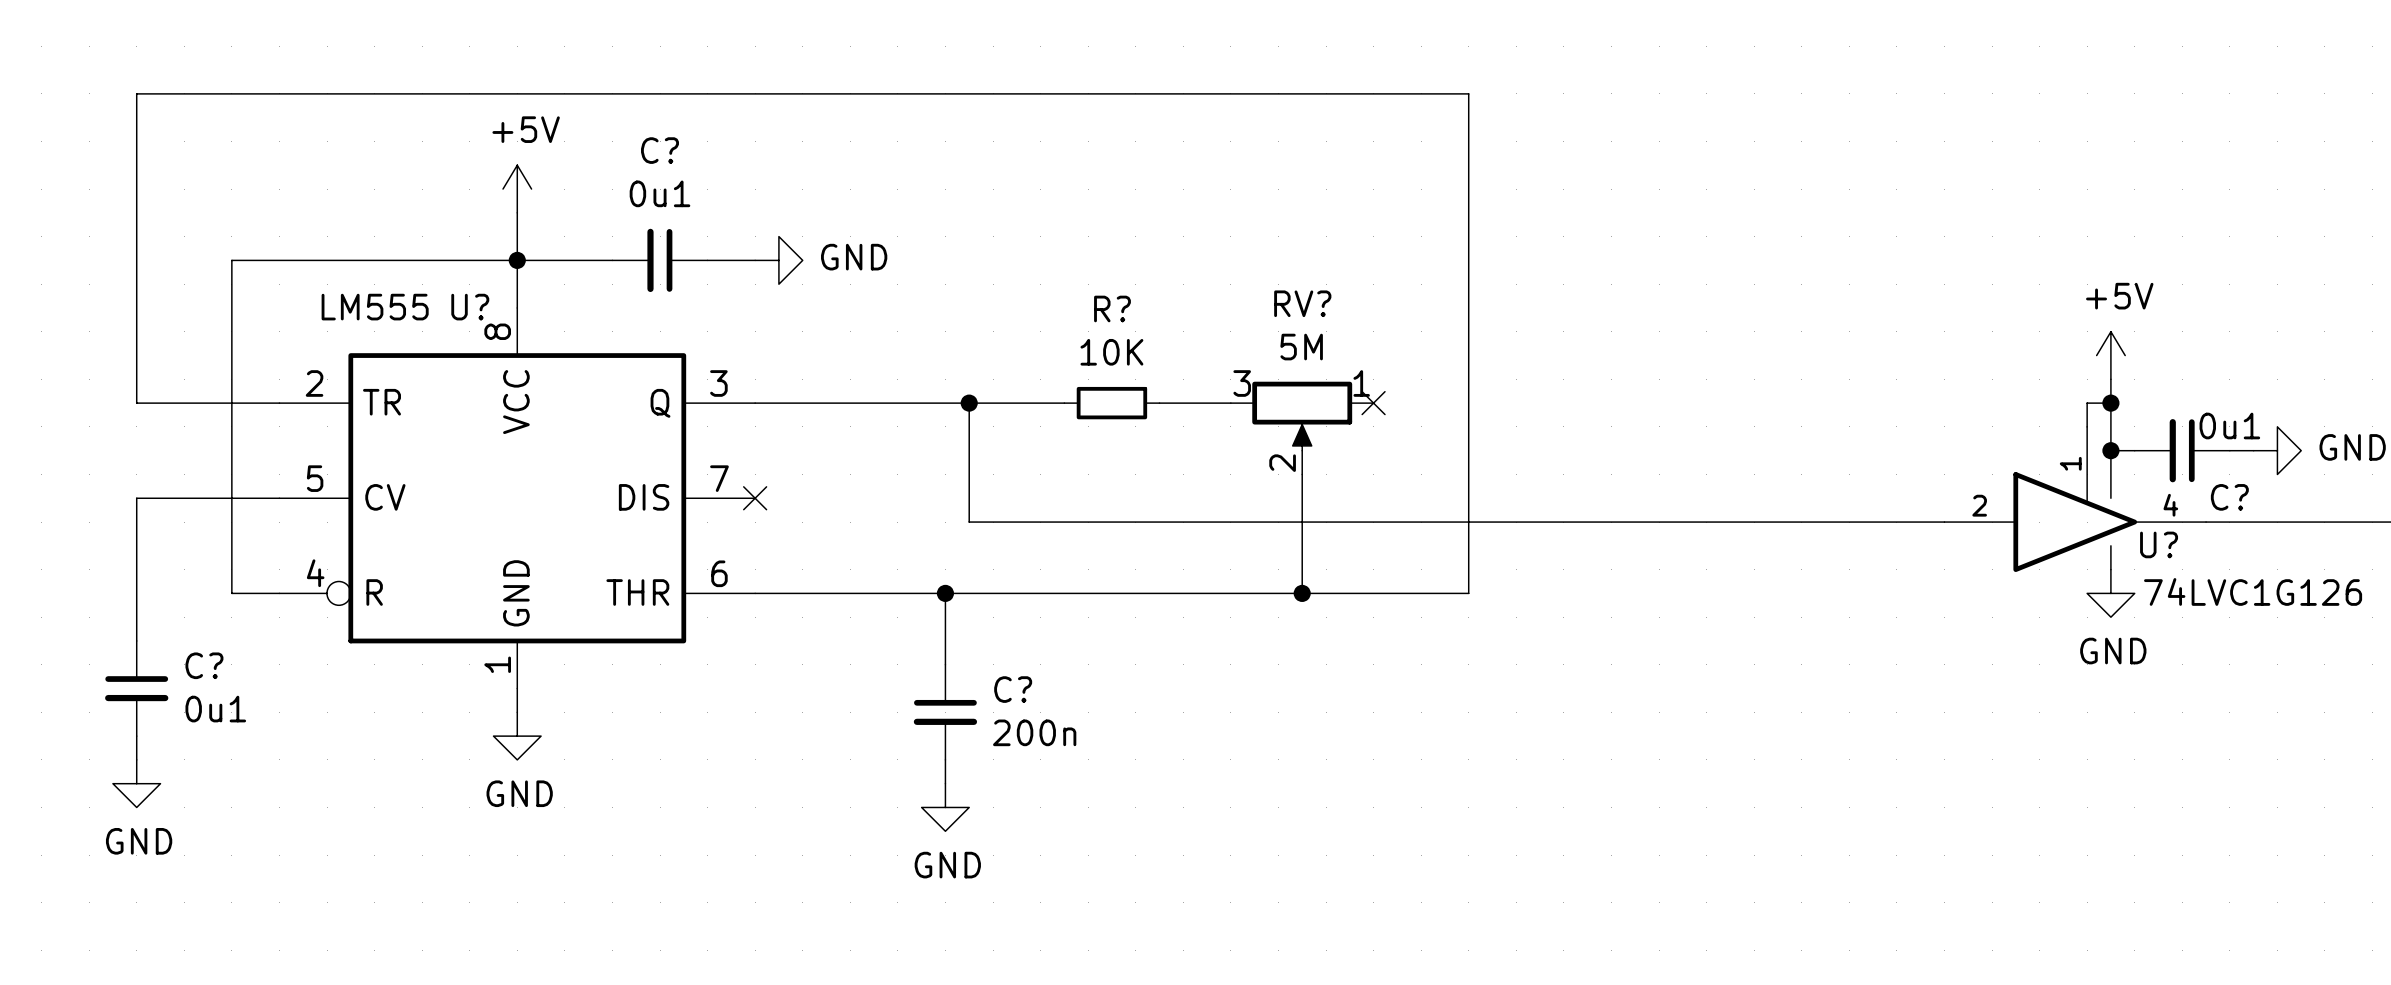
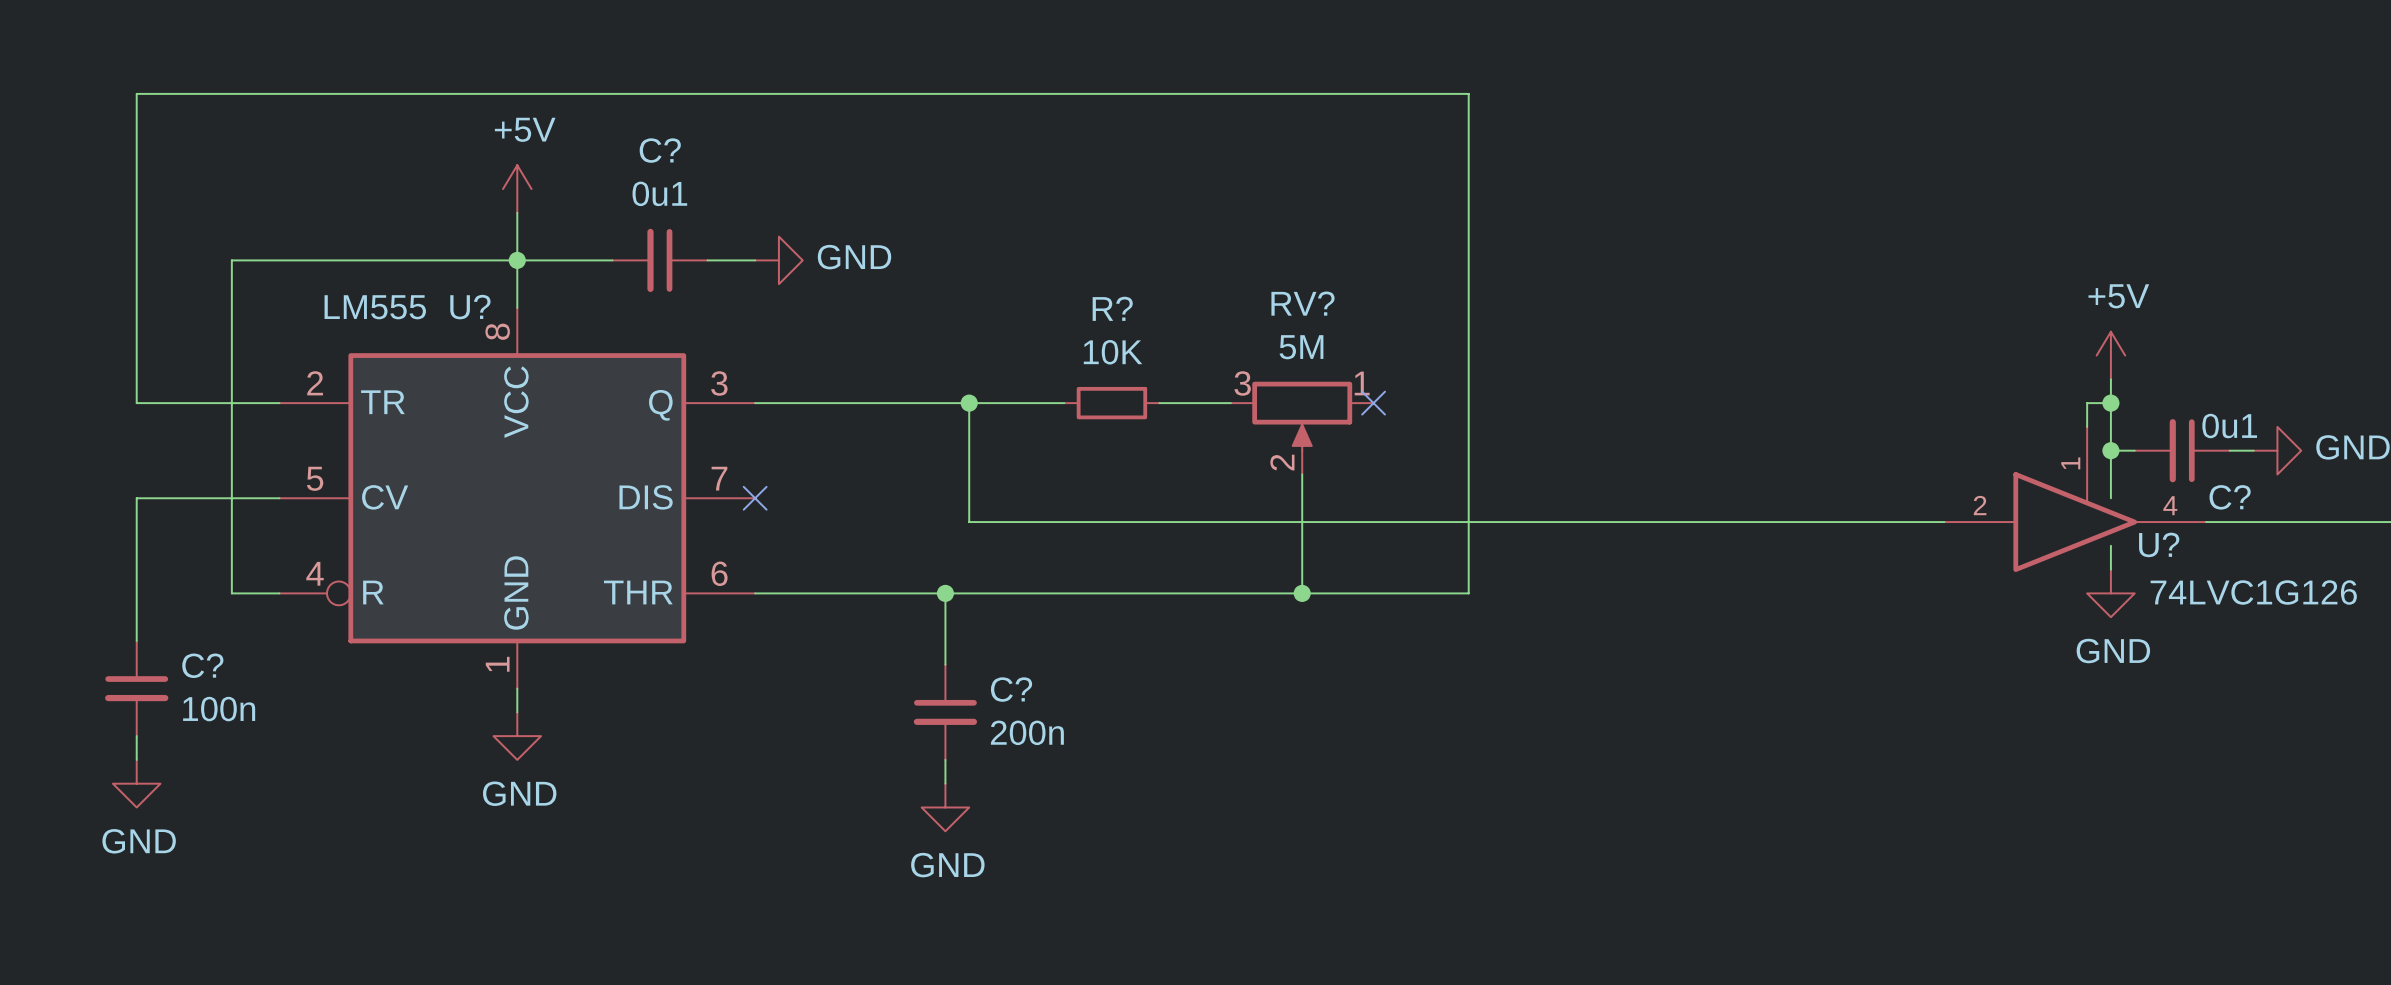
C? value: 0u1 (215, 709) -> 100n (219, 709)

